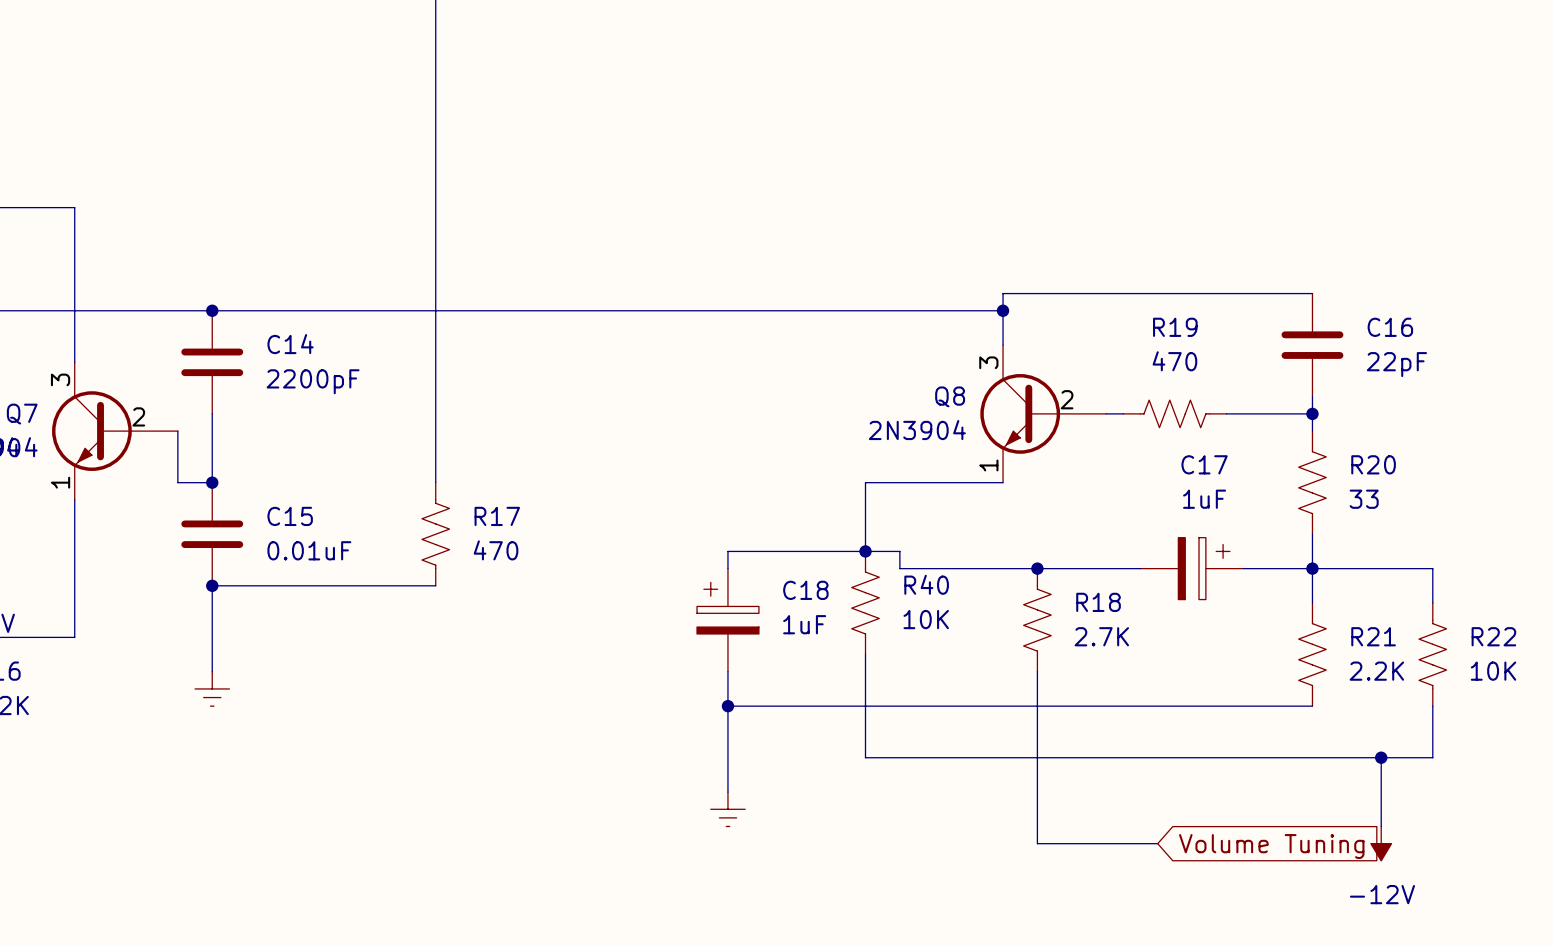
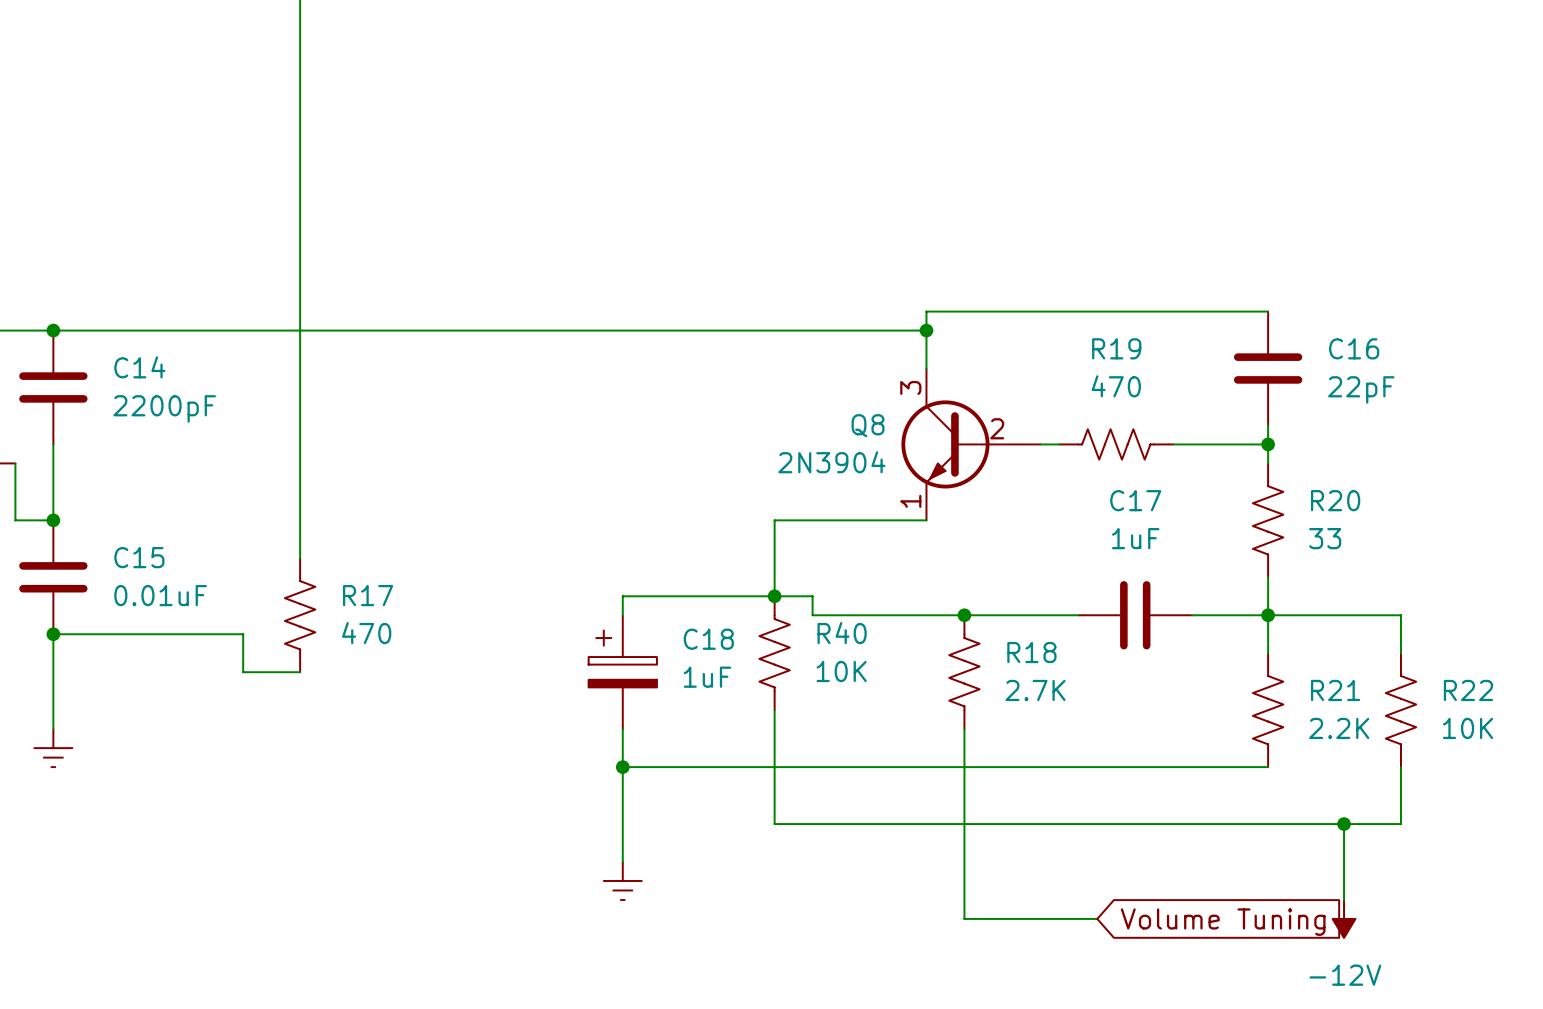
R17 position: (435, 534) -> (300, 615)
C17 symbol: [1140, 537, 1244, 600] -> [1078, 581, 1193, 650]
wire: (384, 585) (435, 585) -> (243, 634) (243, 672) (300, 672)

